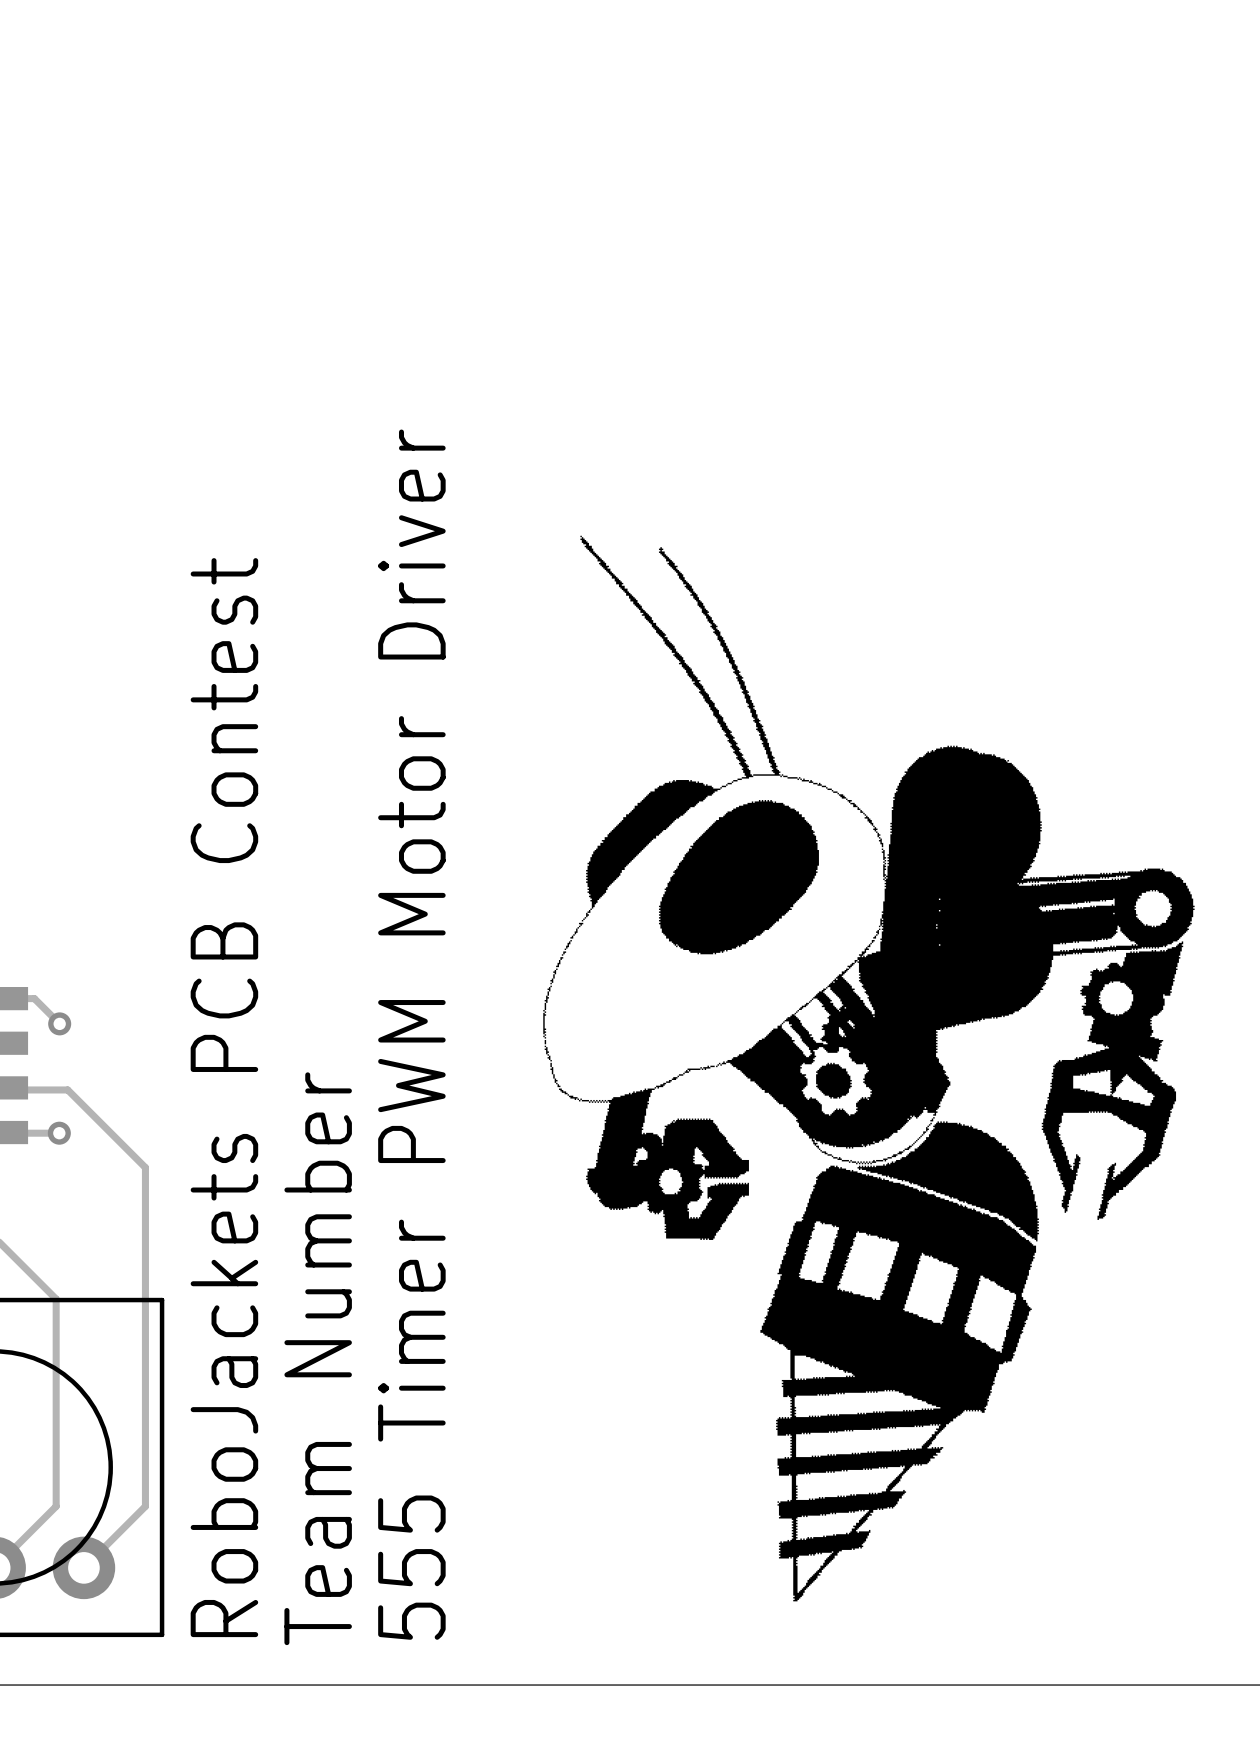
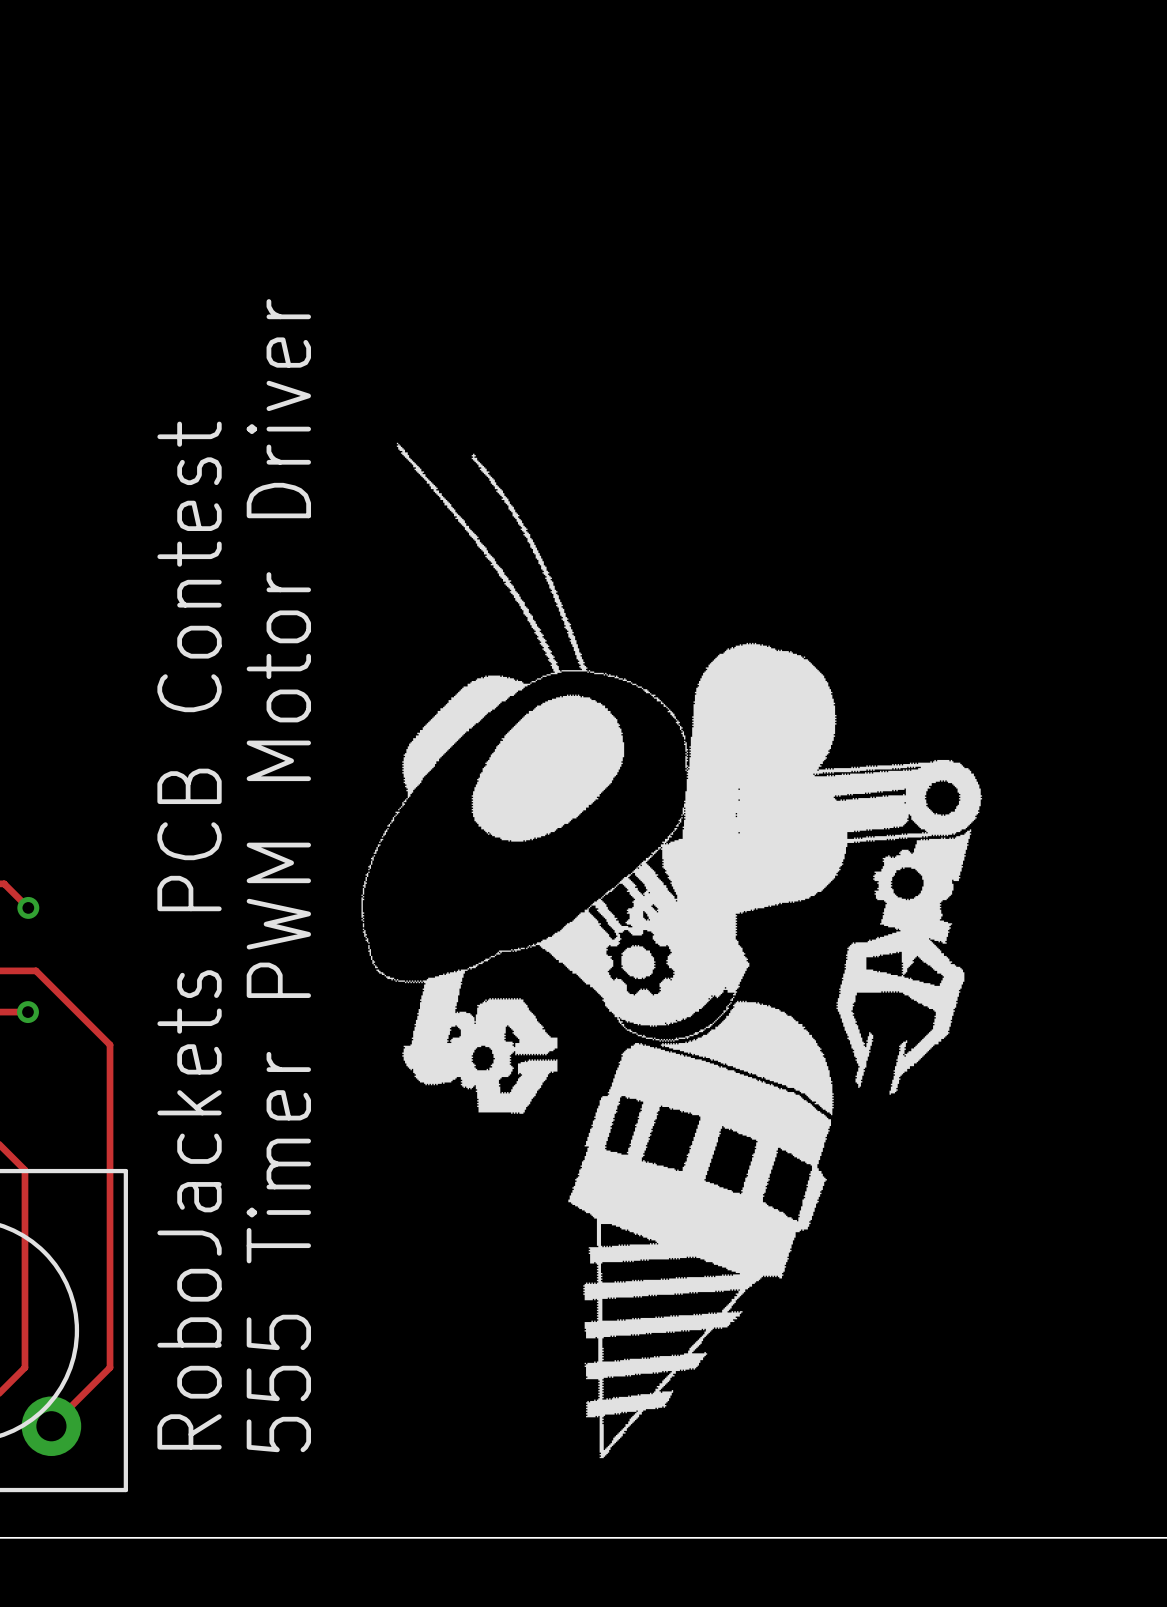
text position: 555 Timer PWM Motor Driver (411, 1034) -> 555 Timer PWM Motor Driver (278, 875)
drawing position: (868, 1068) -> (671, 950)
text position: RoboJackets PCB Contest (224, 1097) -> RoboJackets PCB Contest (189, 935)
text: Team Number (318, 1358) -> none

